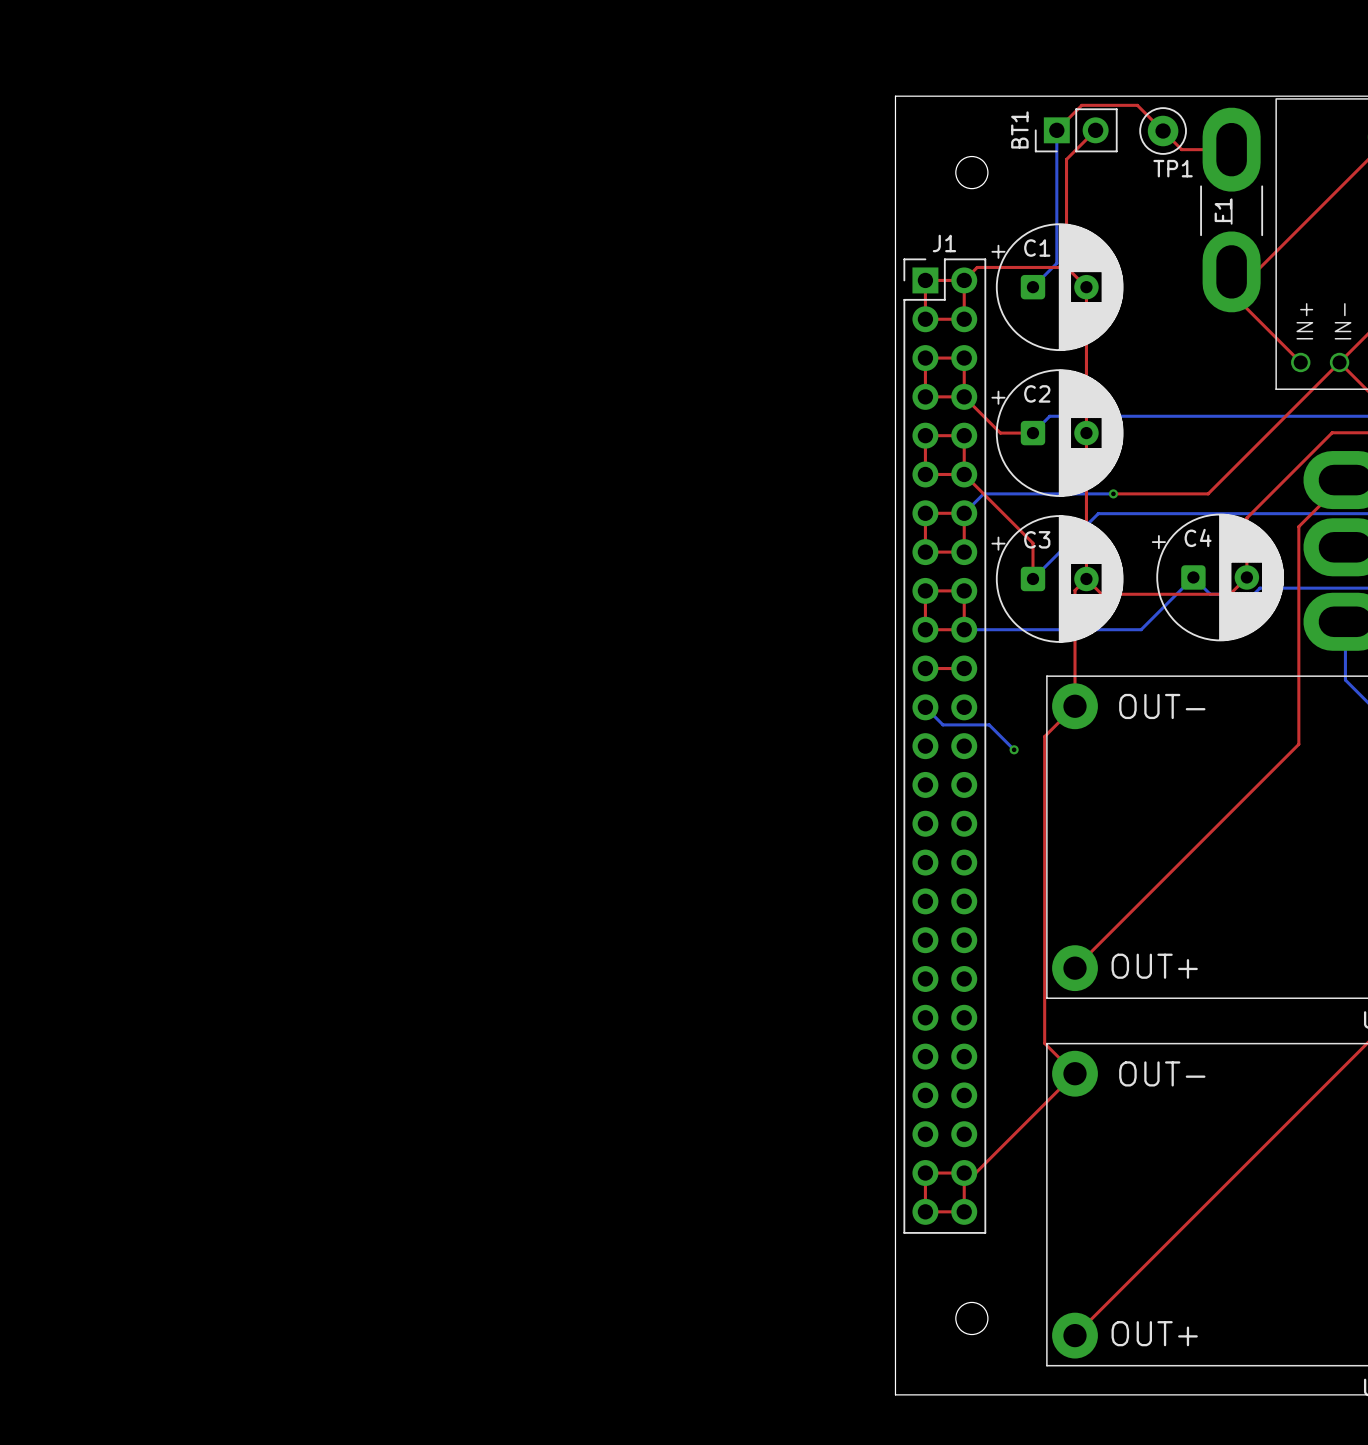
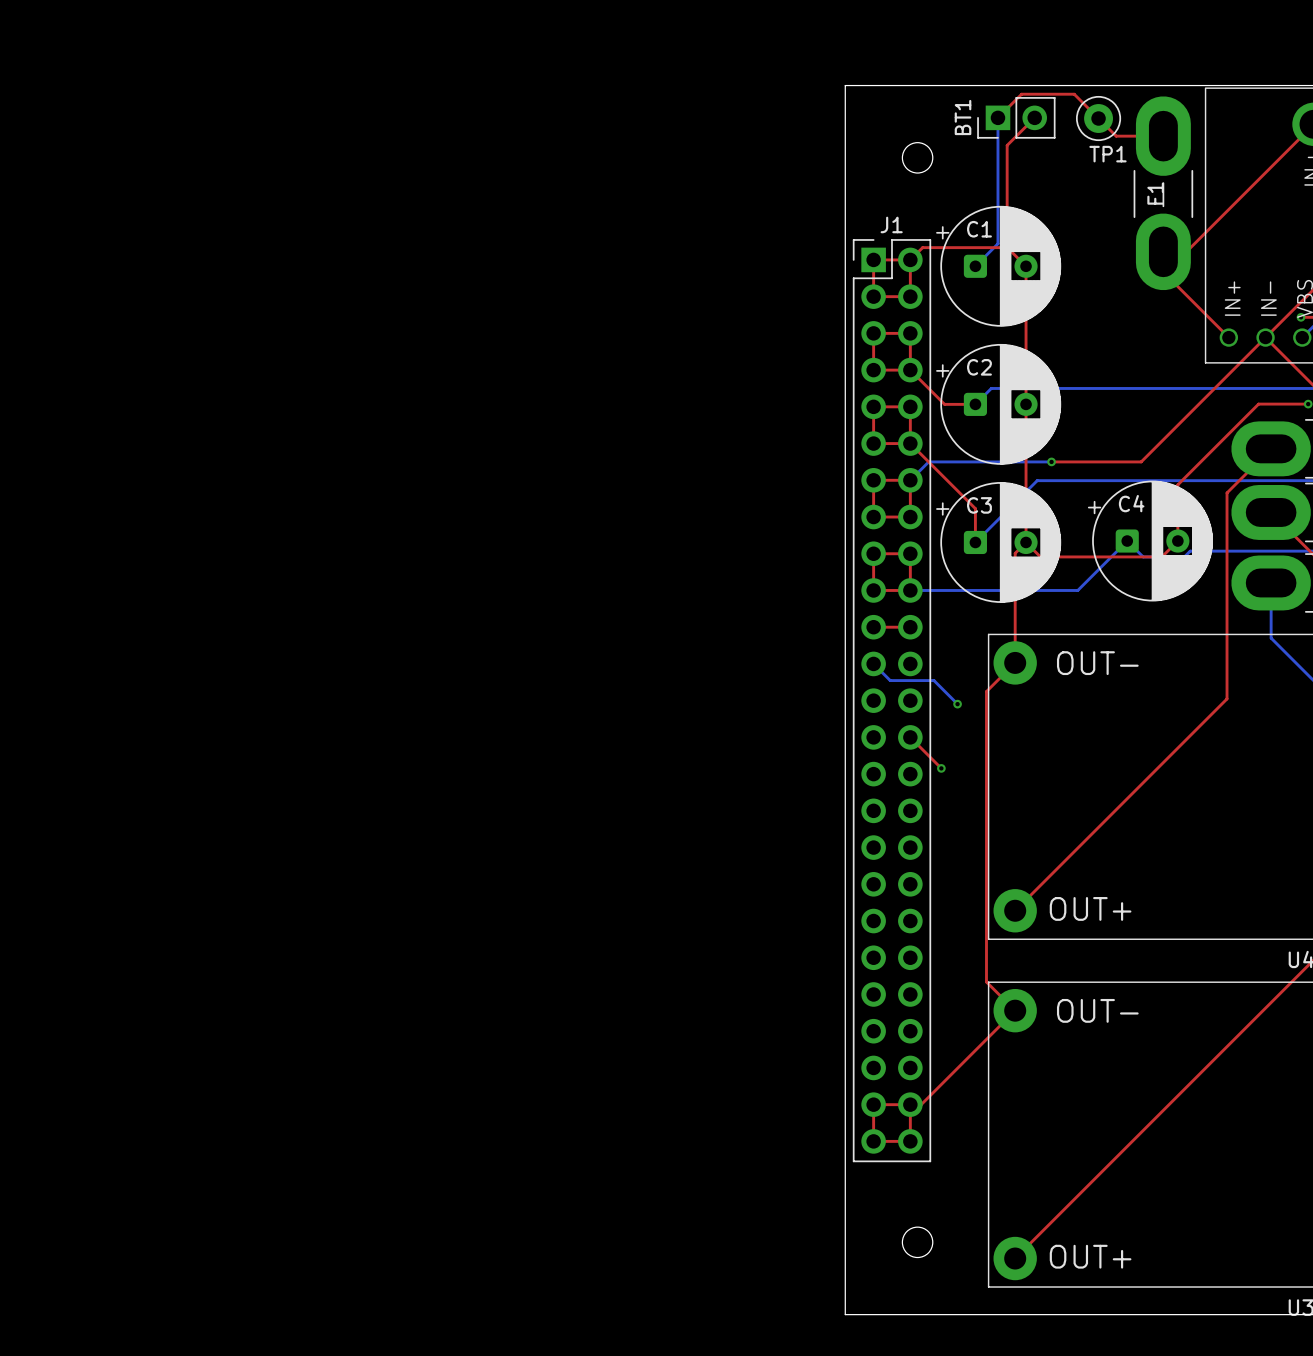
top track: none -> (910, 737) (941, 768)
via: none -> (941, 768)

